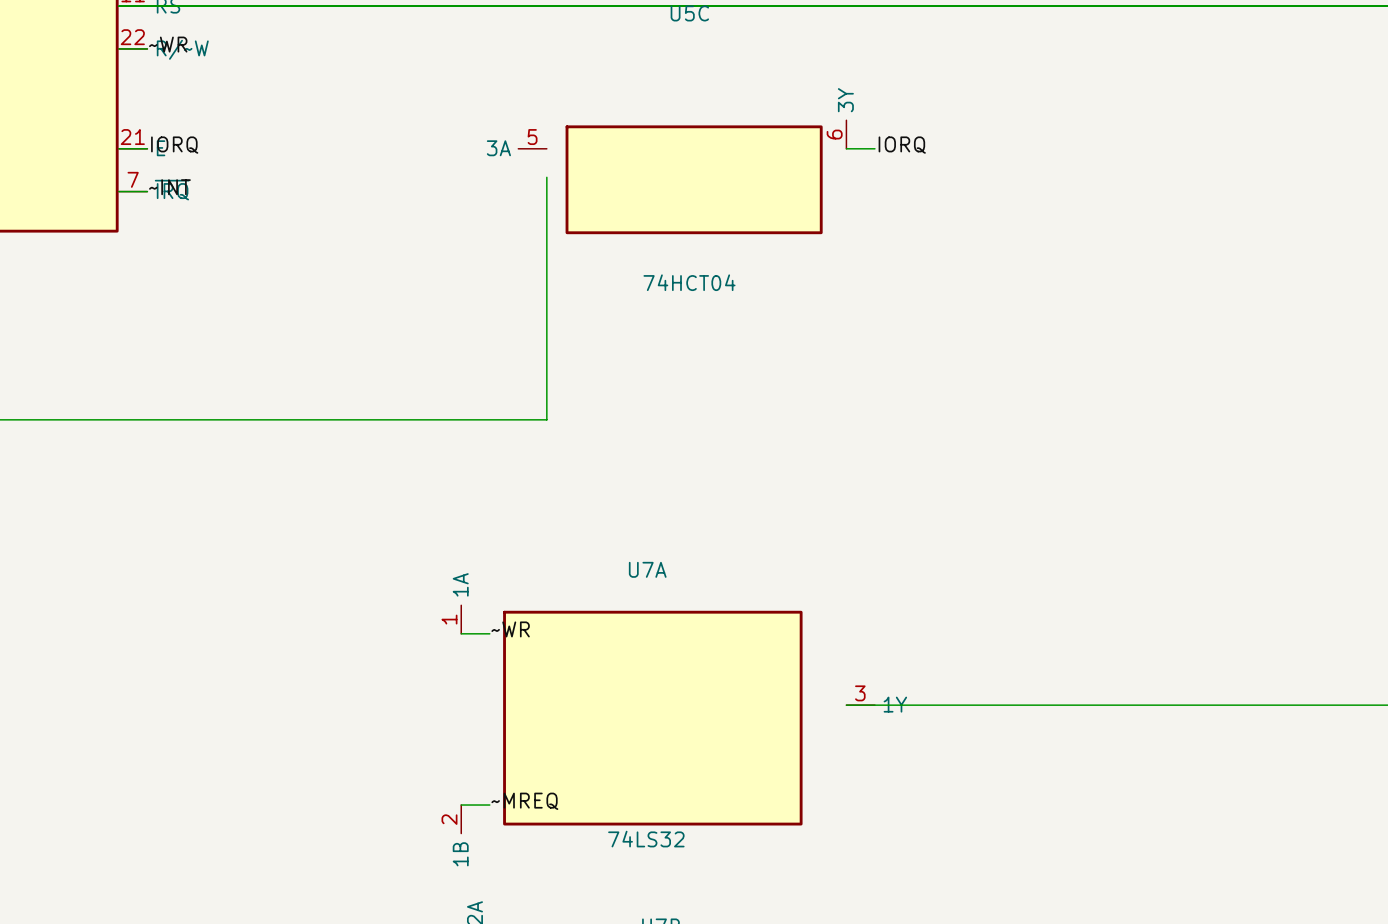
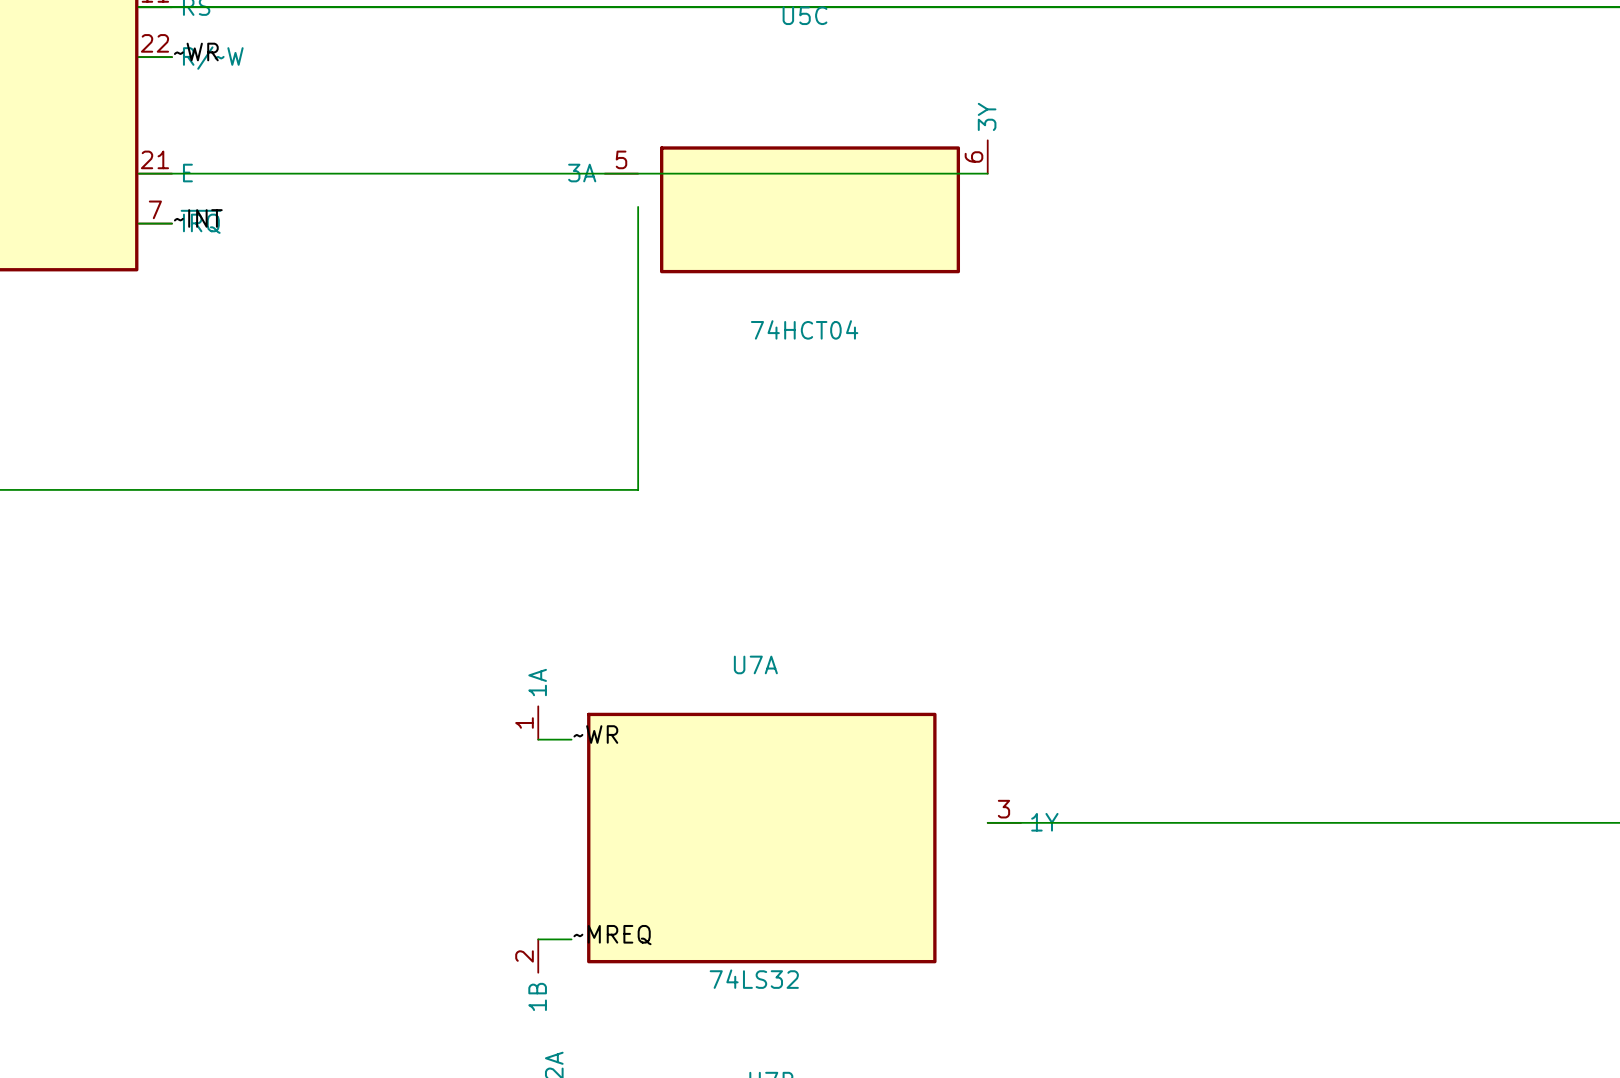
label: IORQ (174, 145) -> none
label: IORQ (902, 145) -> none
wire: (846, 148) (874, 148) -> (987, 173) (172, 173)

